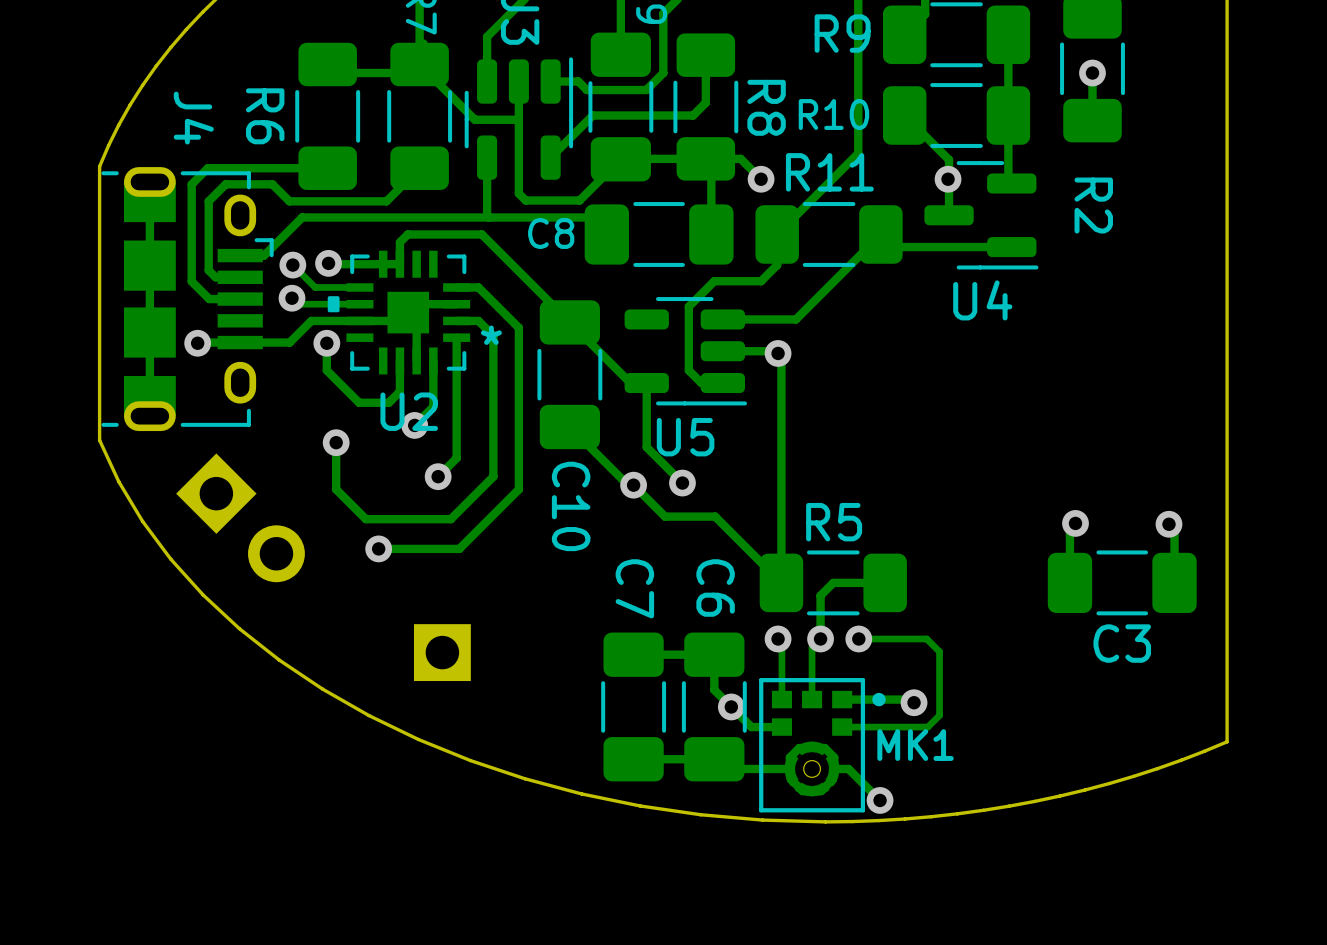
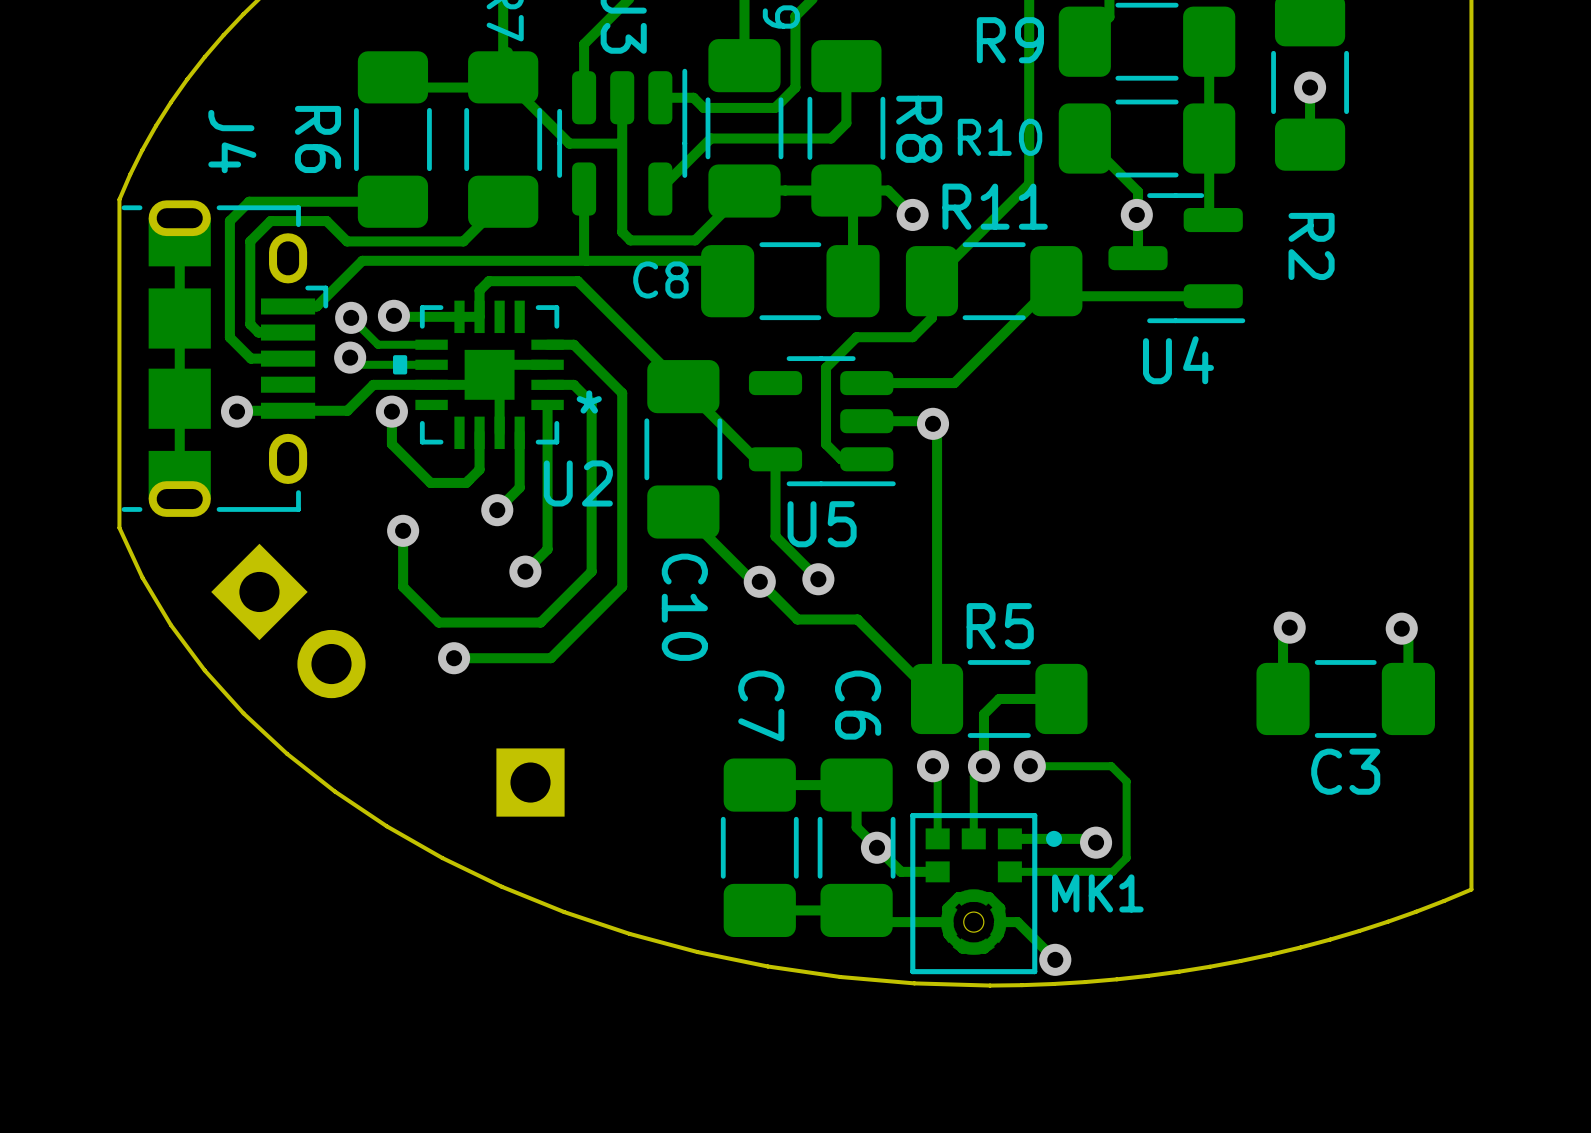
U2 name position: U2 (409, 411) -> U2 (578, 483)

